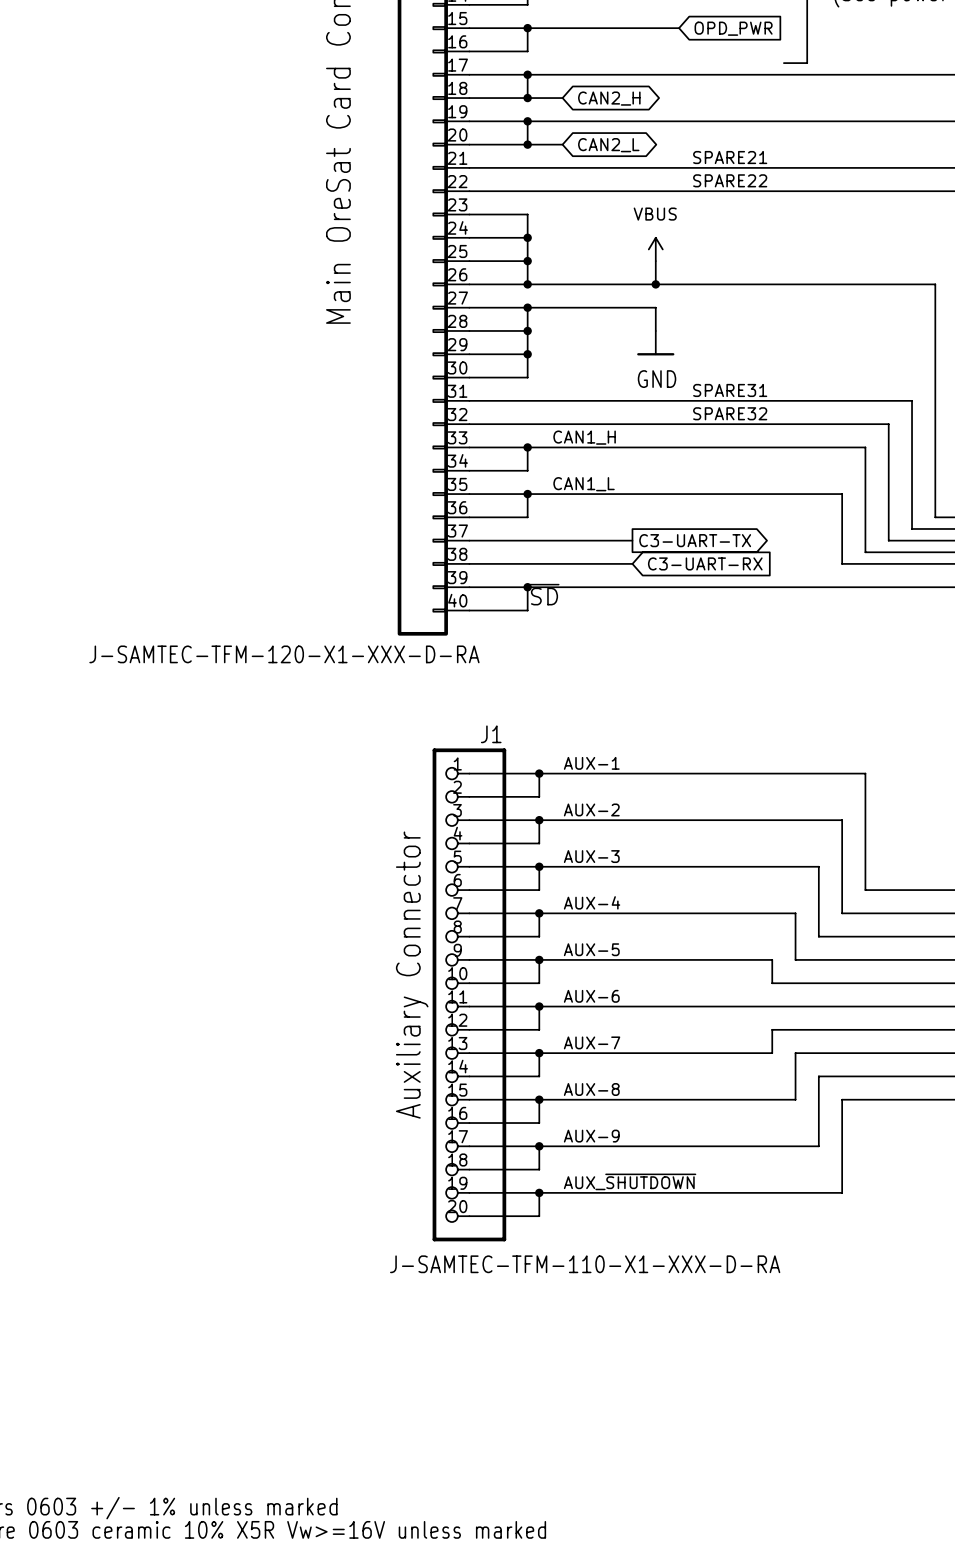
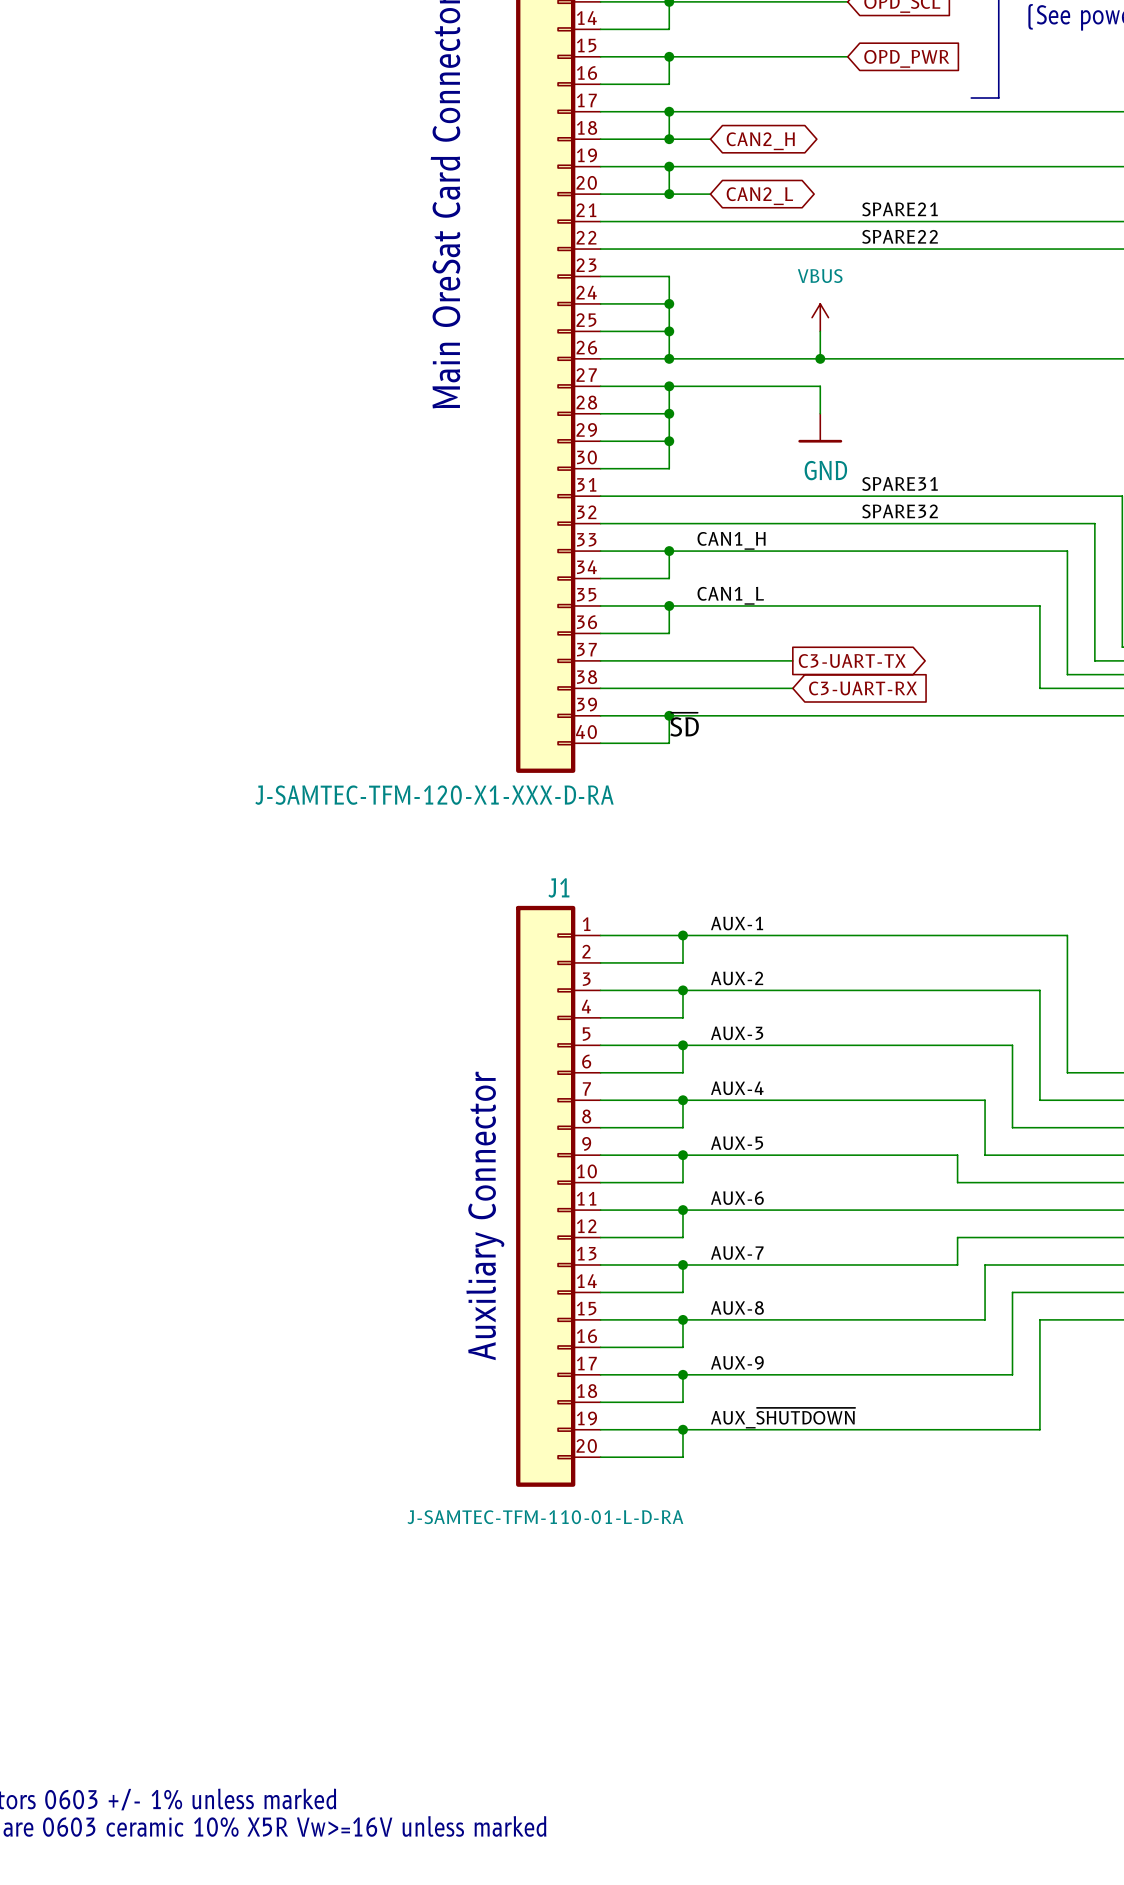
J1 symbol: [432, 748, 507, 1242] -> [516, 905, 601, 1487]
text position: Auxiliary Connector (412, 975) -> Auxiliary Connector (485, 1215)
J1 value: J-SAMTEC-TFM-110-X1-XXX-D-RA (585, 1264) -> J-SAMTEC-TFM-110-01-L-D-RA (545, 1517)

